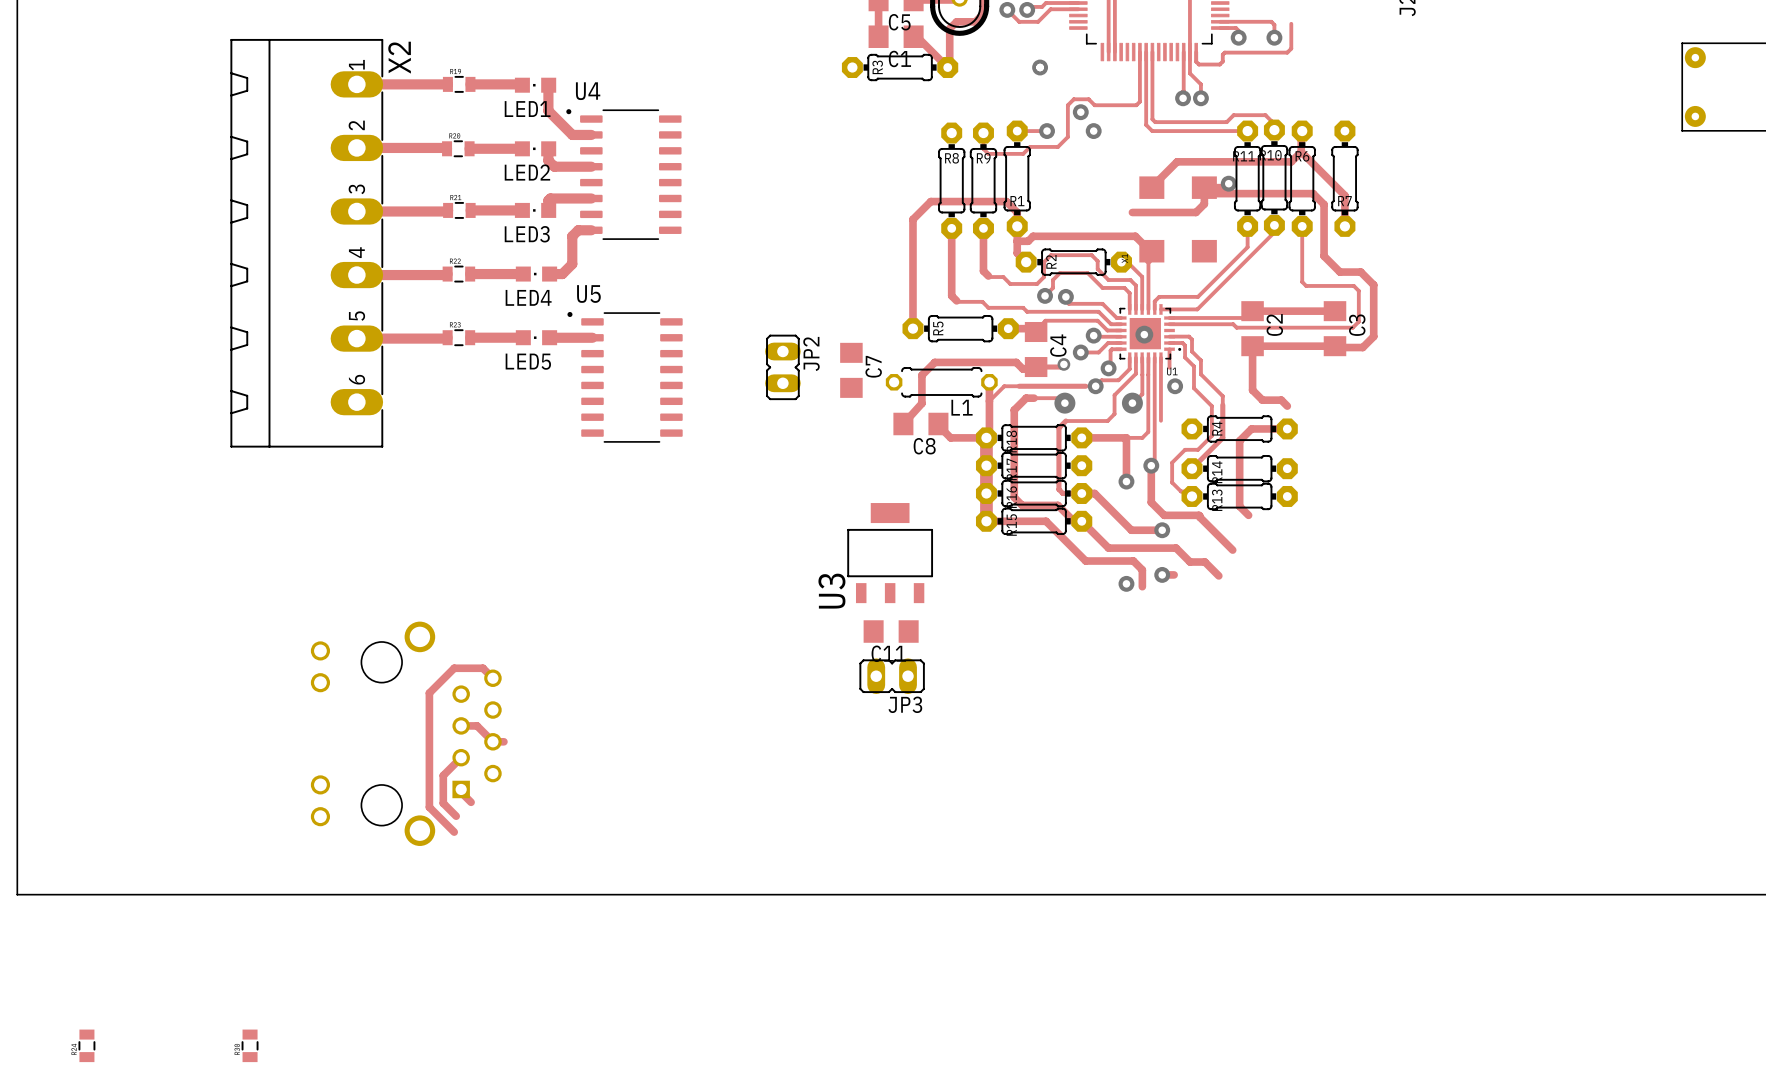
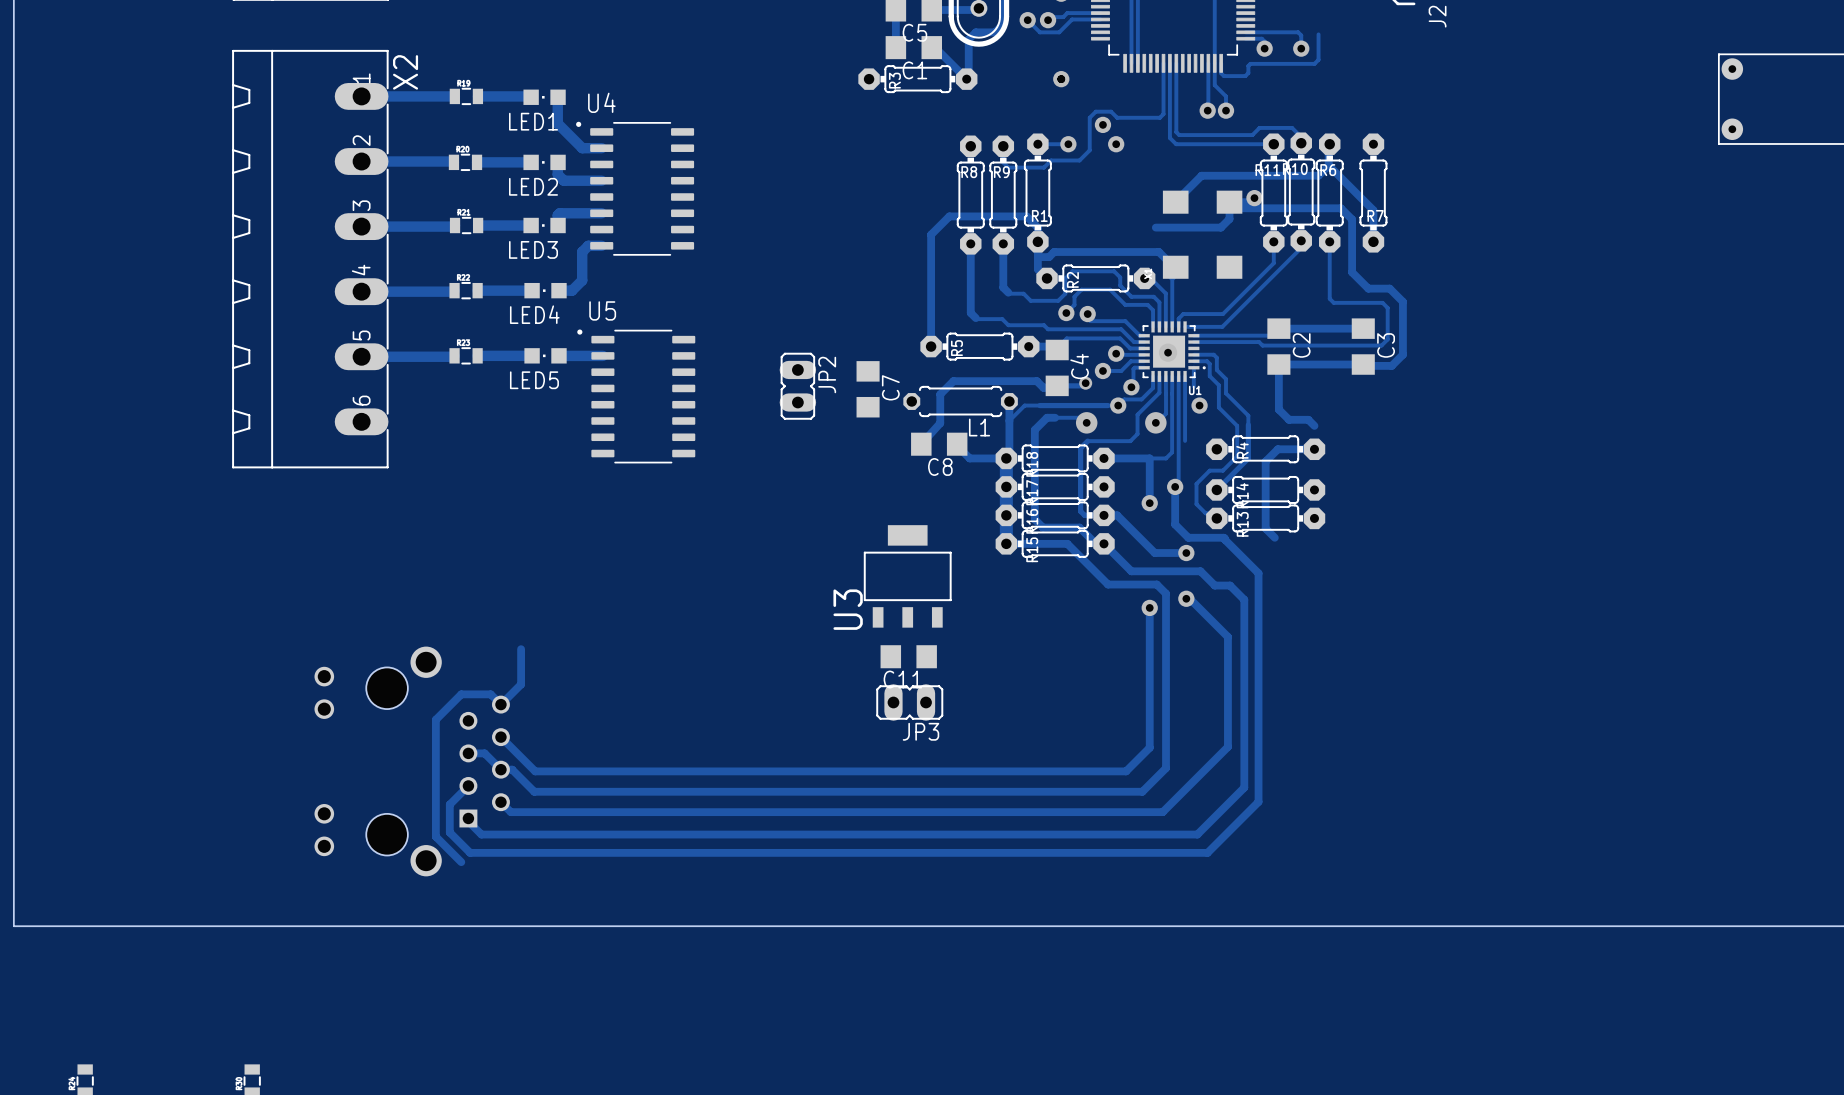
track: (1165, 574) (1174, 574) -> (1189, 598) (1227, 636) (1227, 746) (1162, 812) (510, 812) (500, 802)
track: none -> (1244, 599) (1244, 787) (1197, 834) (481, 834) (478, 831)
track: none -> (1149, 607) (1149, 747) (1126, 771) (535, 771) (500, 737)
track: none -> (1166, 610) (1166, 768) (1142, 791) (534, 791) (512, 769)
track: none -> (521, 649) (521, 684) (500, 704)
track: (443, 775) (443, 803) (456, 816) -> (450, 804) (449, 832) (470, 852) (1207, 852) (1258, 801) (1258, 573)

